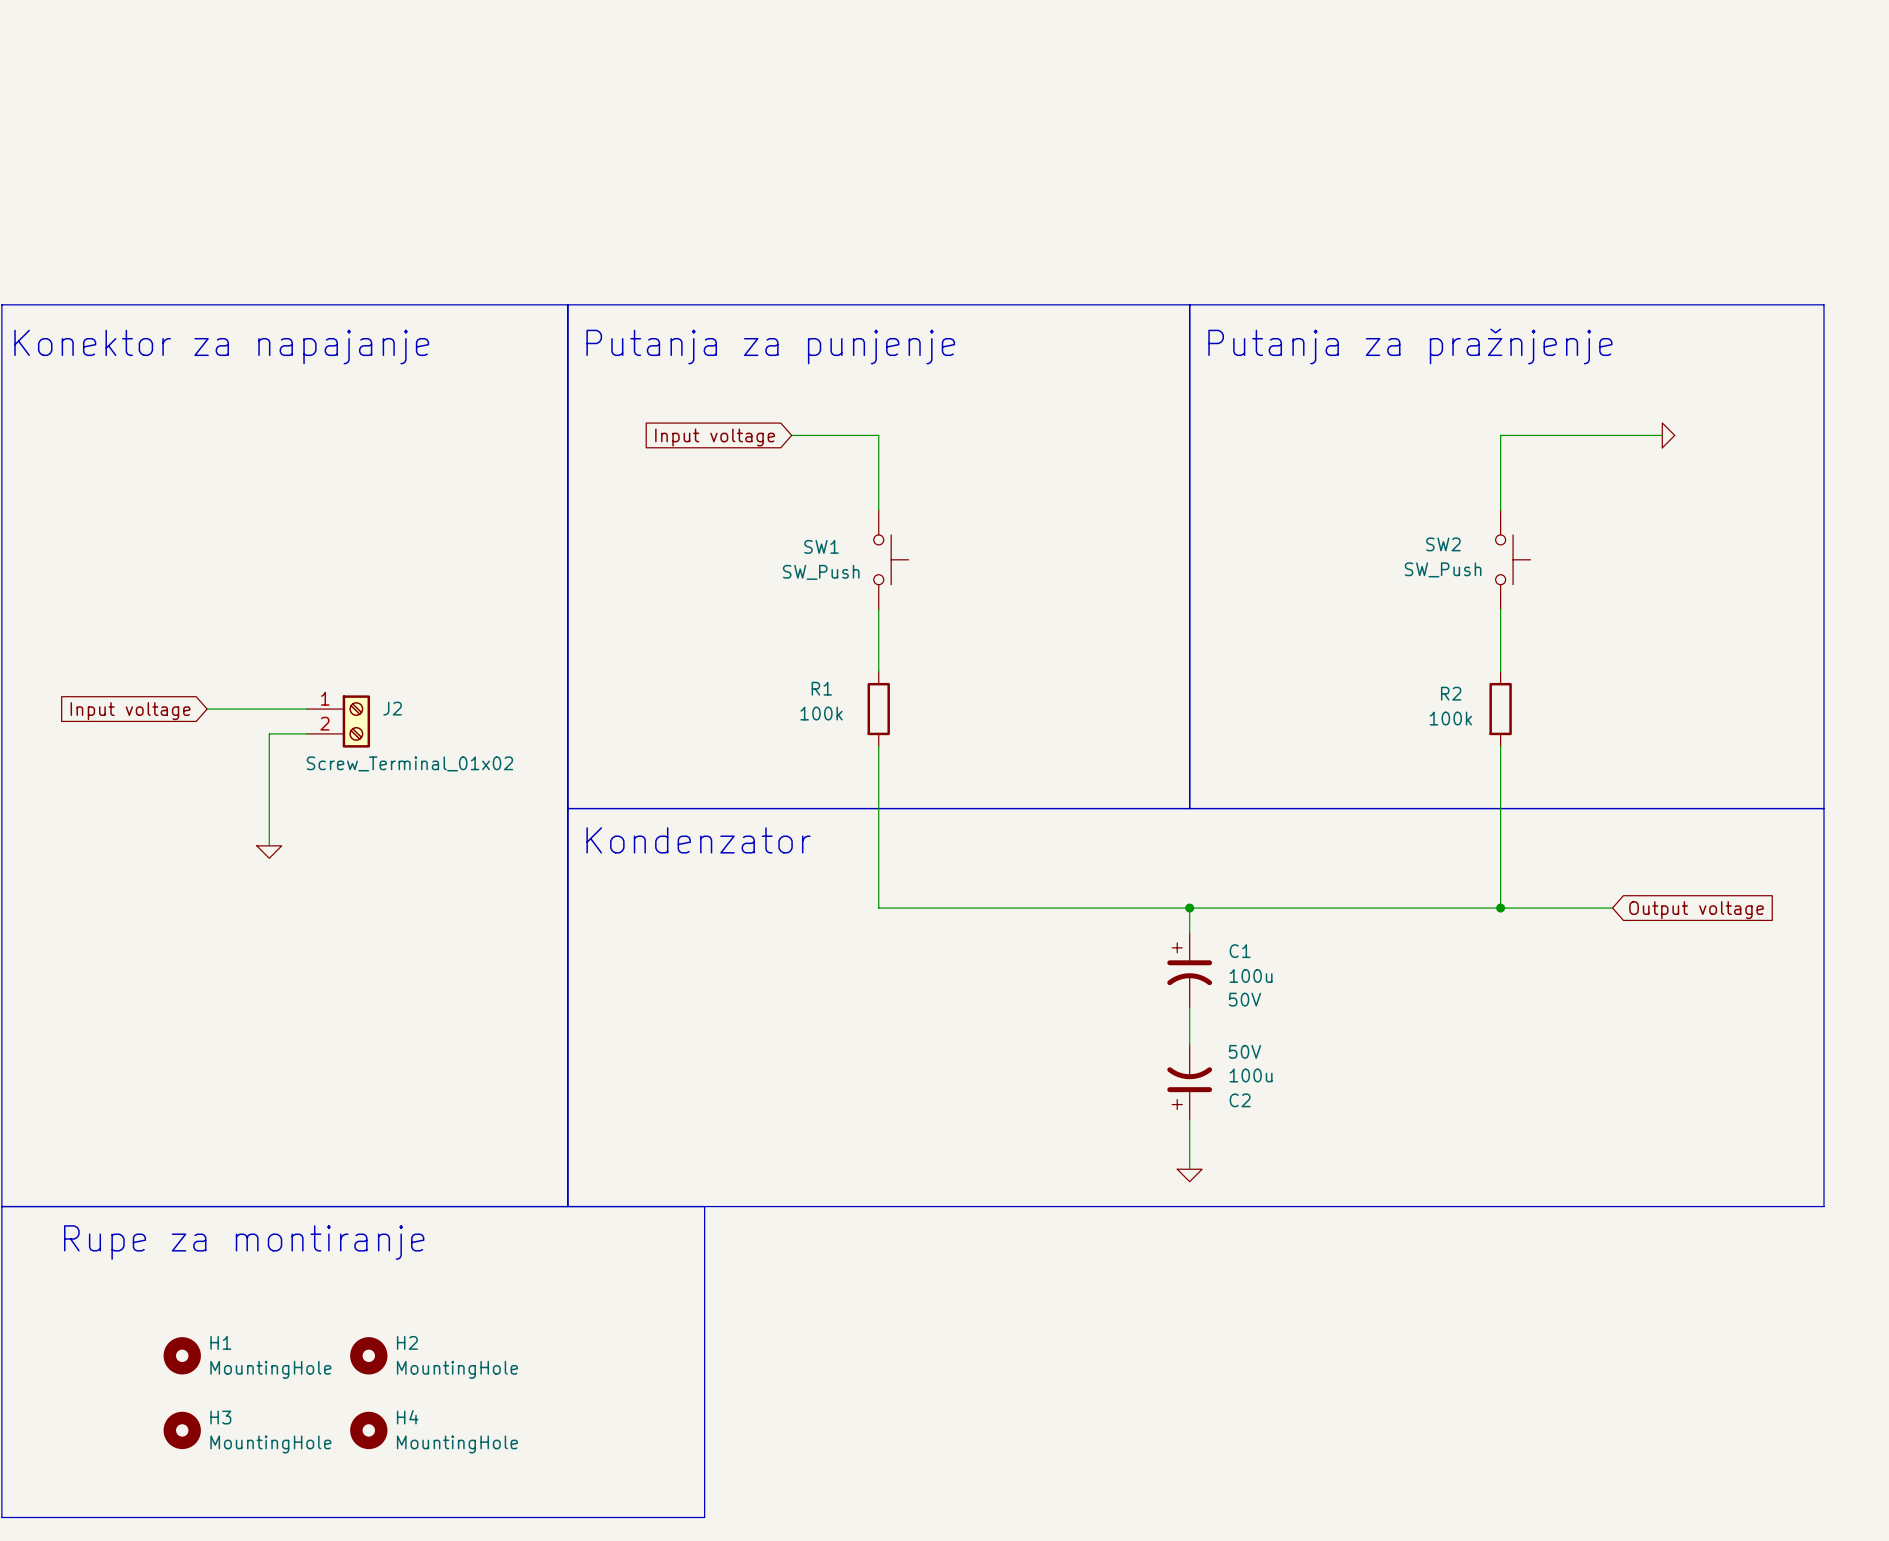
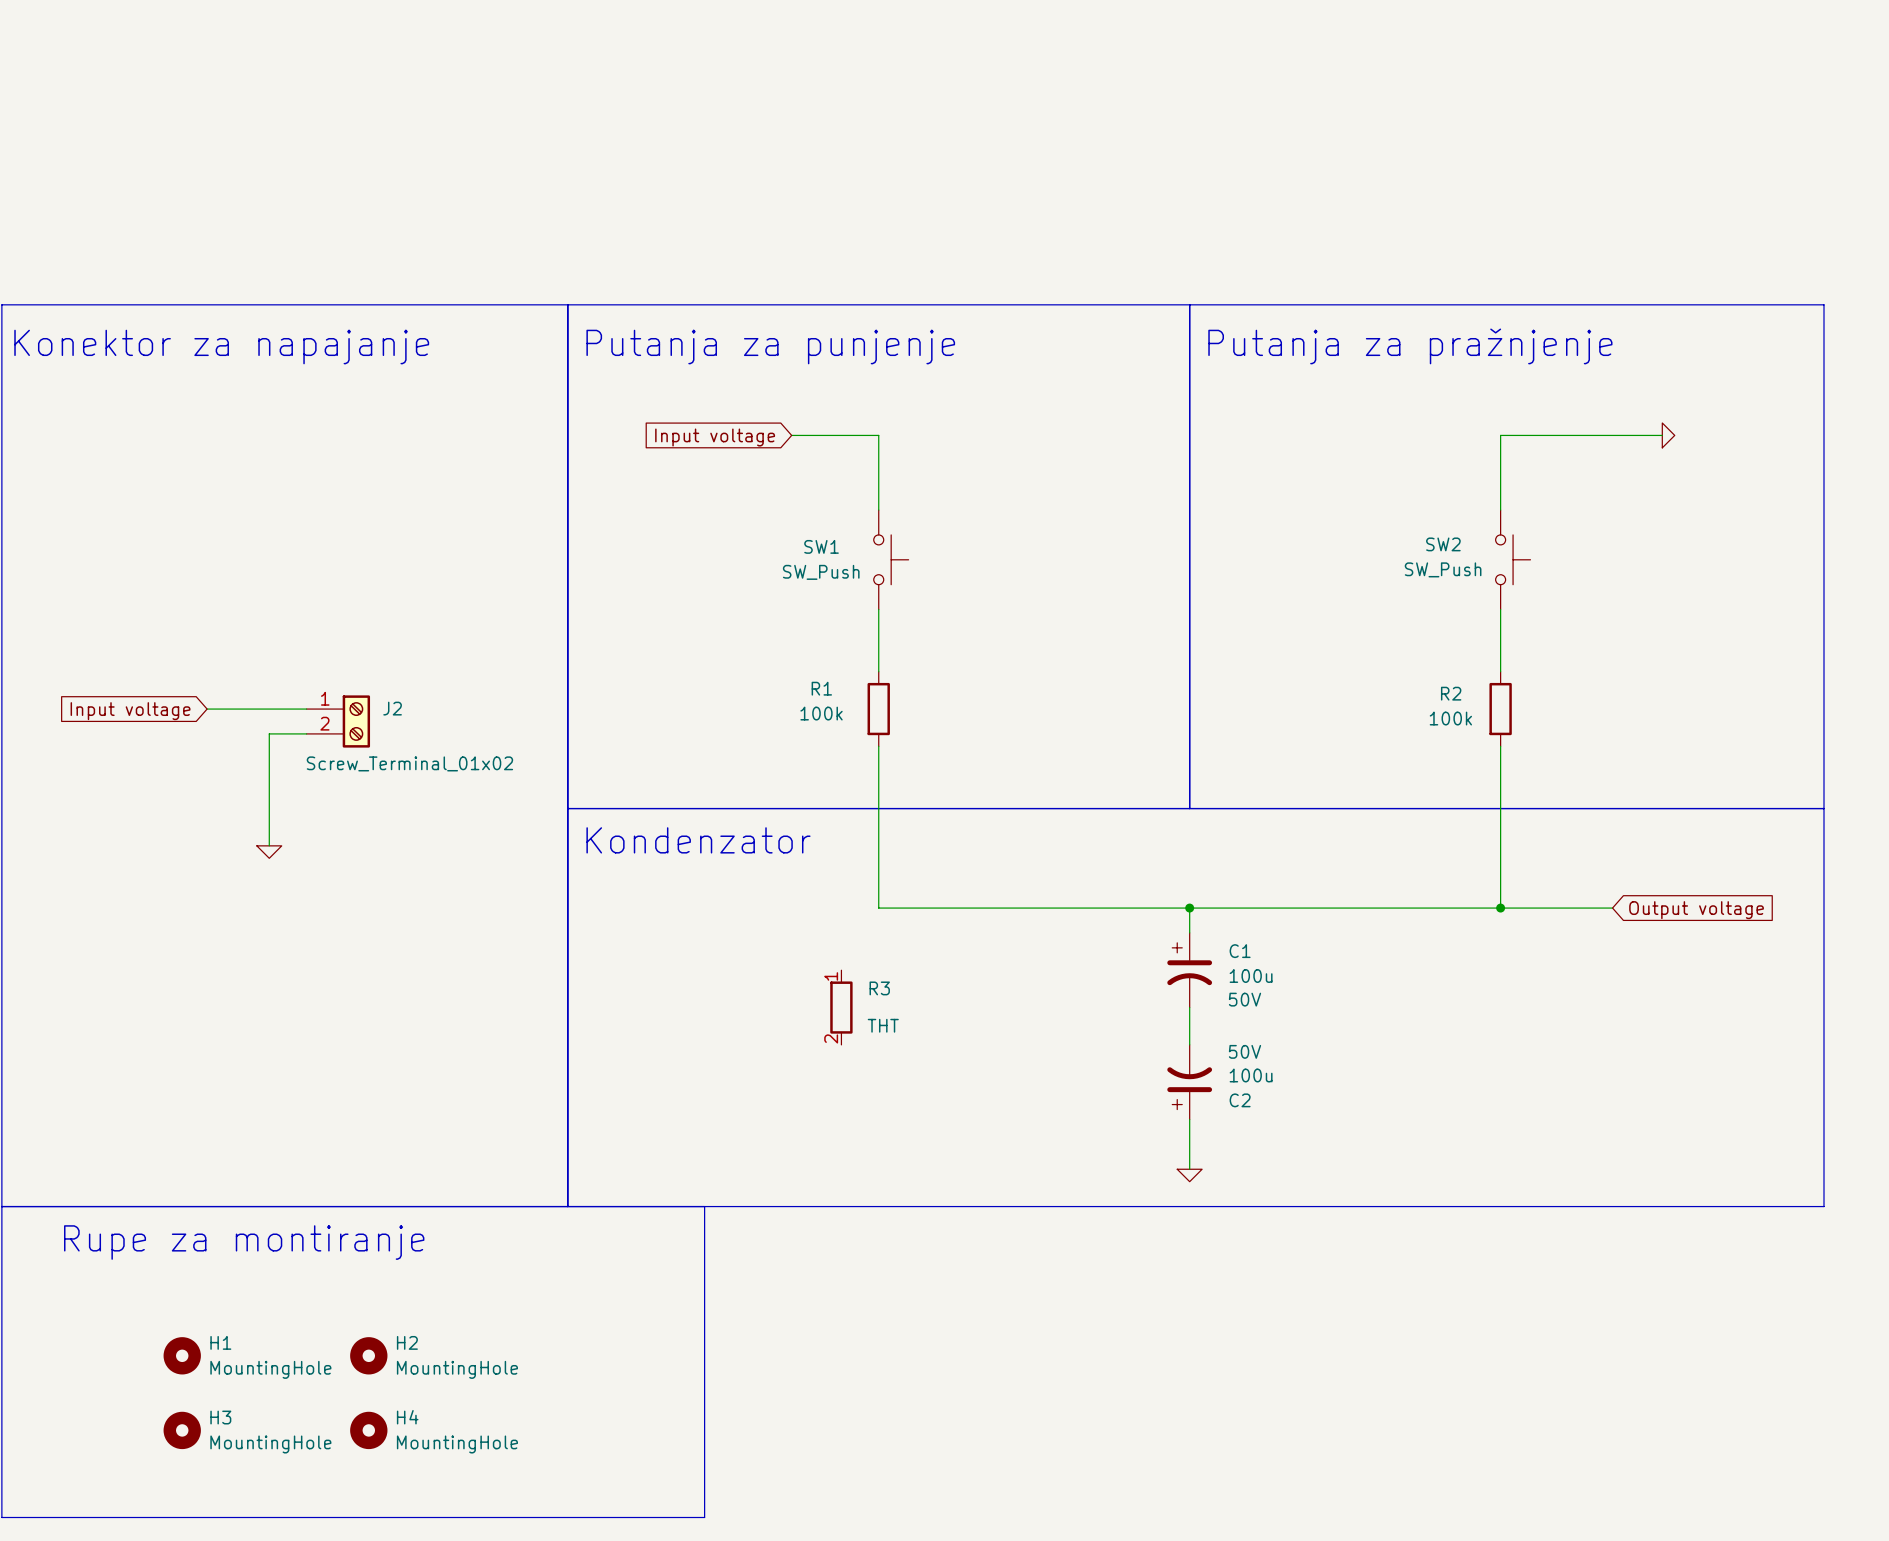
R3: none -> (841, 1007)

